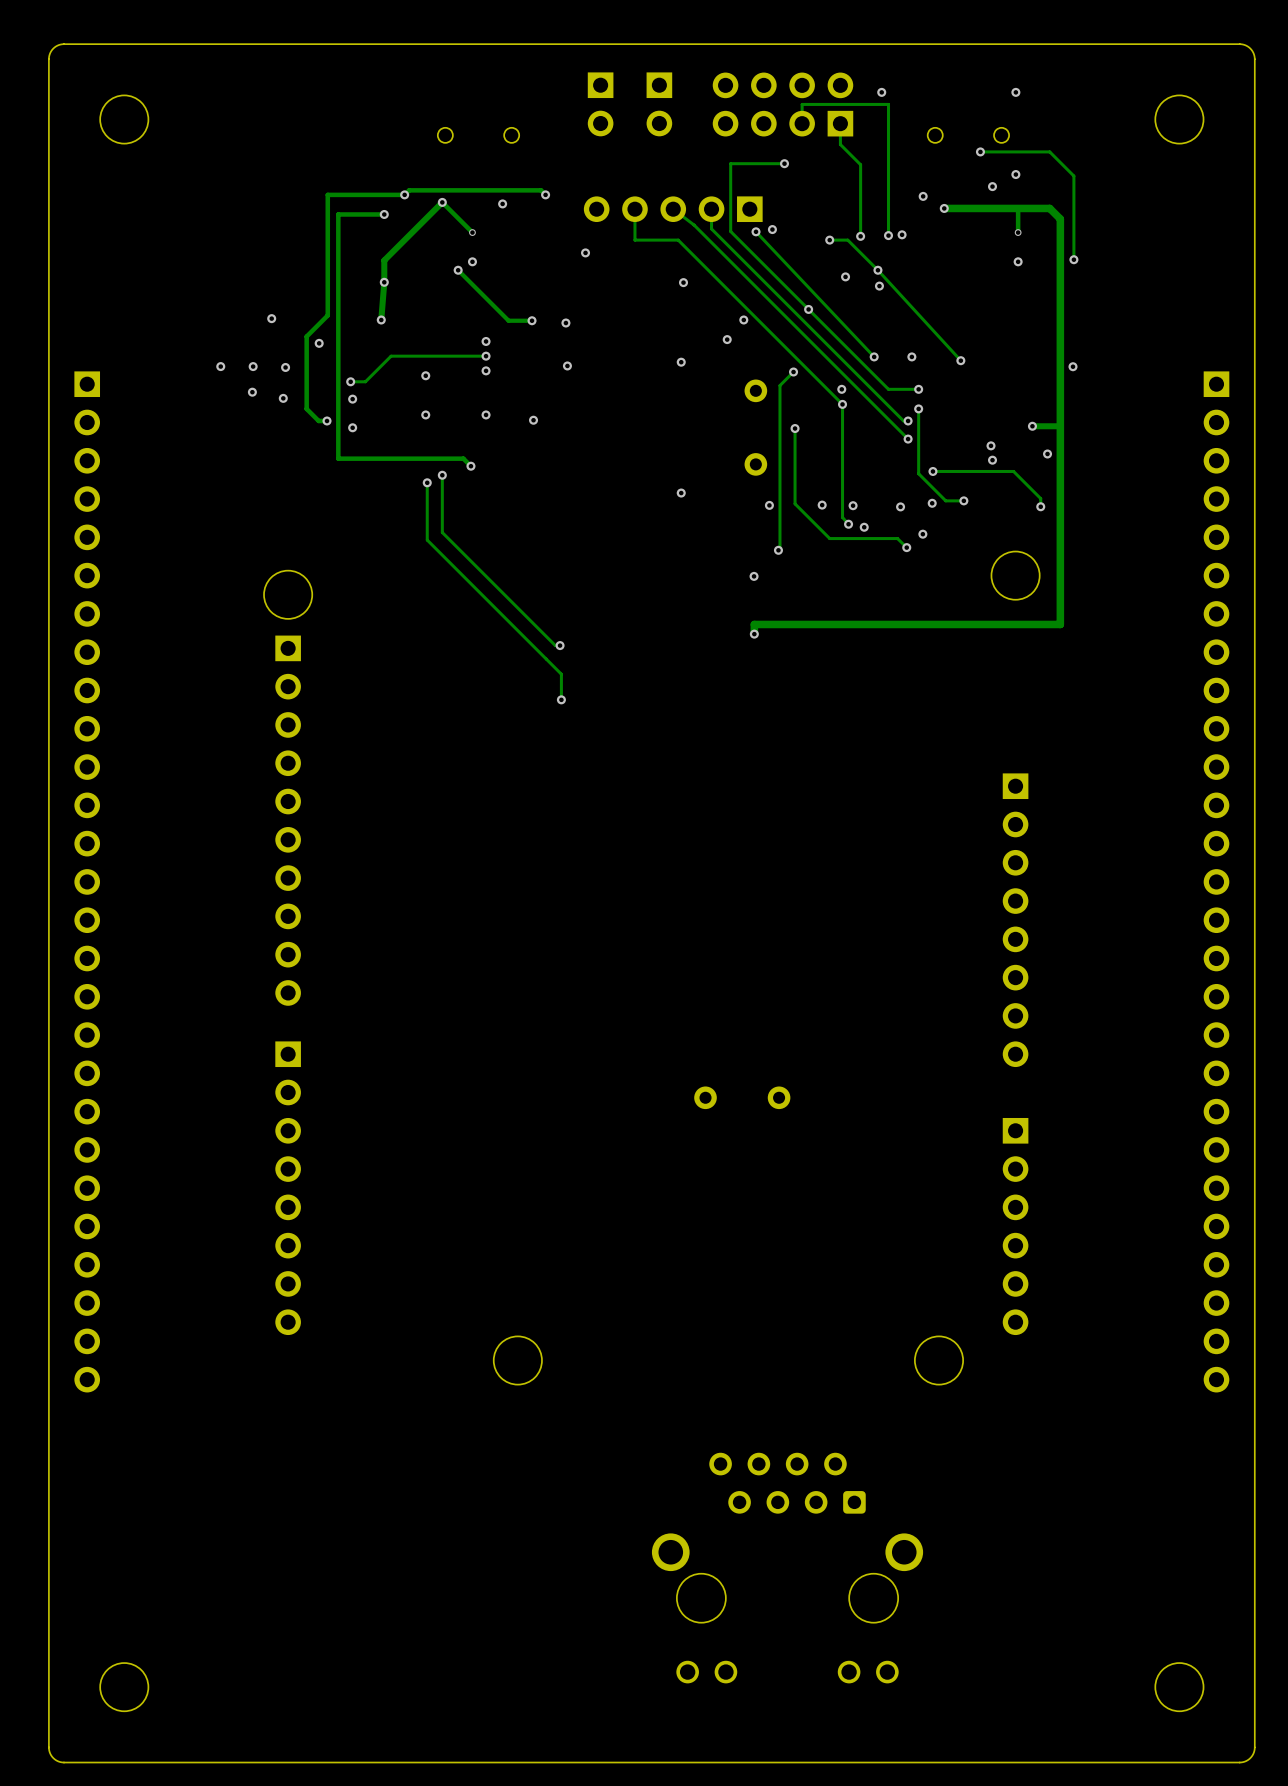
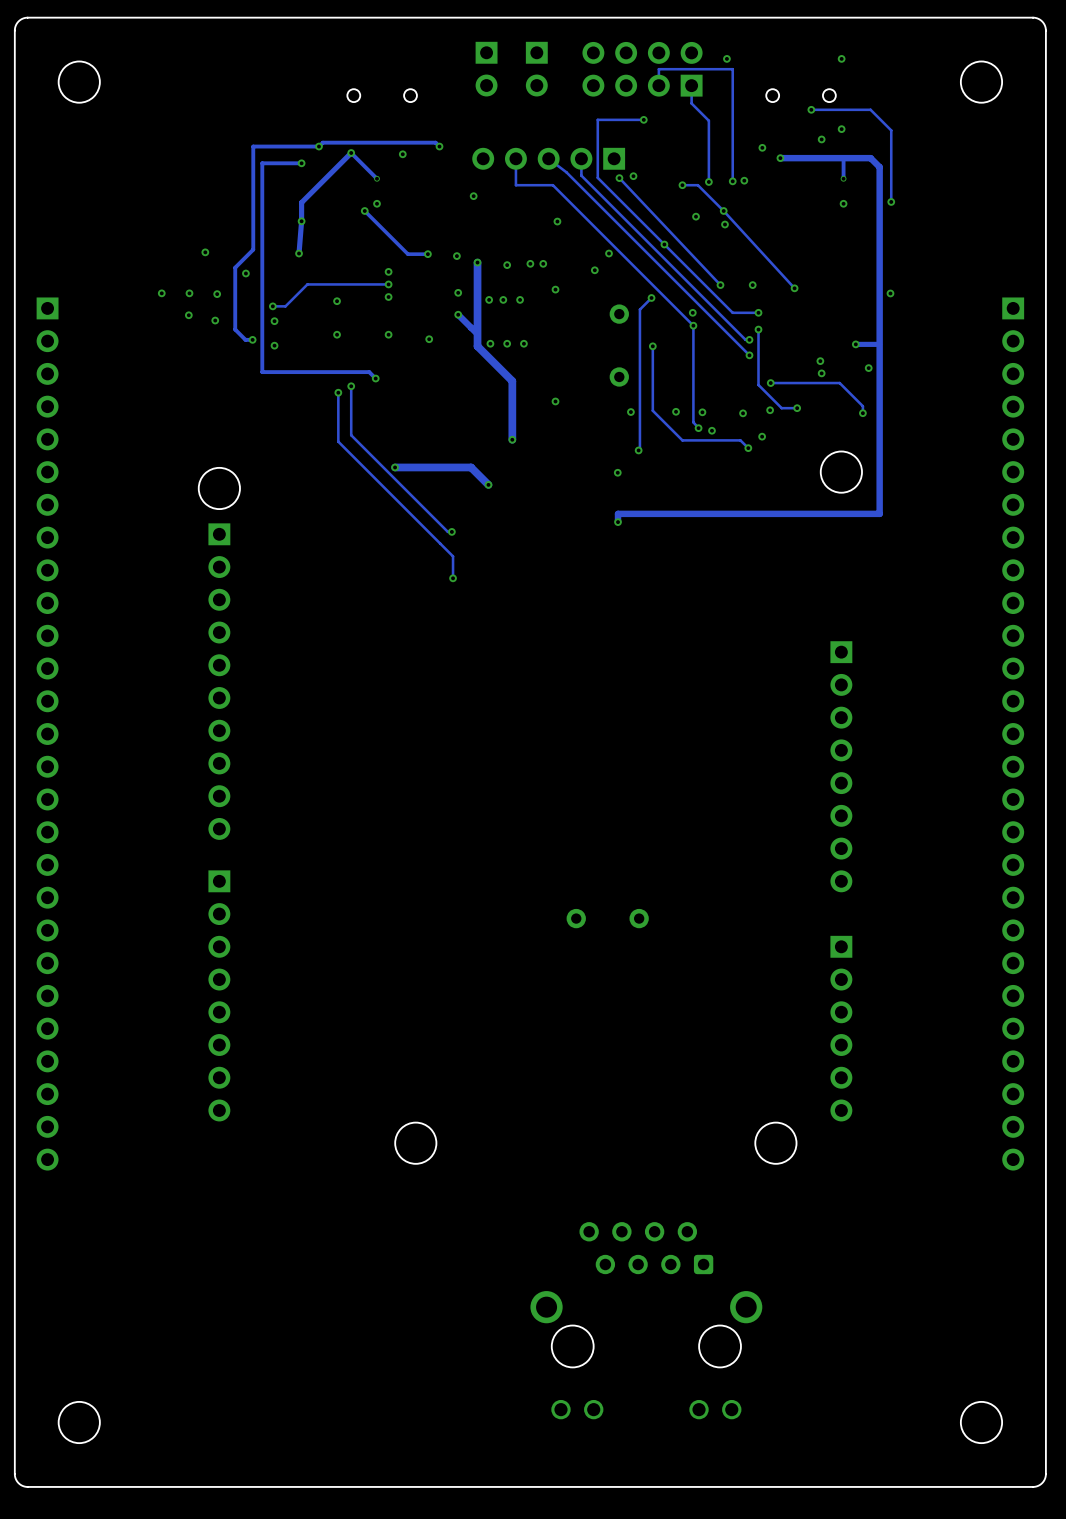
track: none -> (477, 262) (477, 346) (512, 381) (512, 439)
via: none -> (477, 262)
via: none -> (530, 263)
via: none -> (543, 263)
via: none -> (507, 265)
via: none -> (489, 299)
via: none -> (503, 299)
via: none -> (520, 299)
track: none -> (458, 314) (477, 334)
via: none -> (458, 314)
via: none -> (490, 343)
via: none -> (507, 343)
via: none -> (523, 343)
via: none -> (512, 439)
track: none -> (395, 467) (471, 467) (488, 484)
via: none -> (395, 467)
via: none -> (488, 484)

